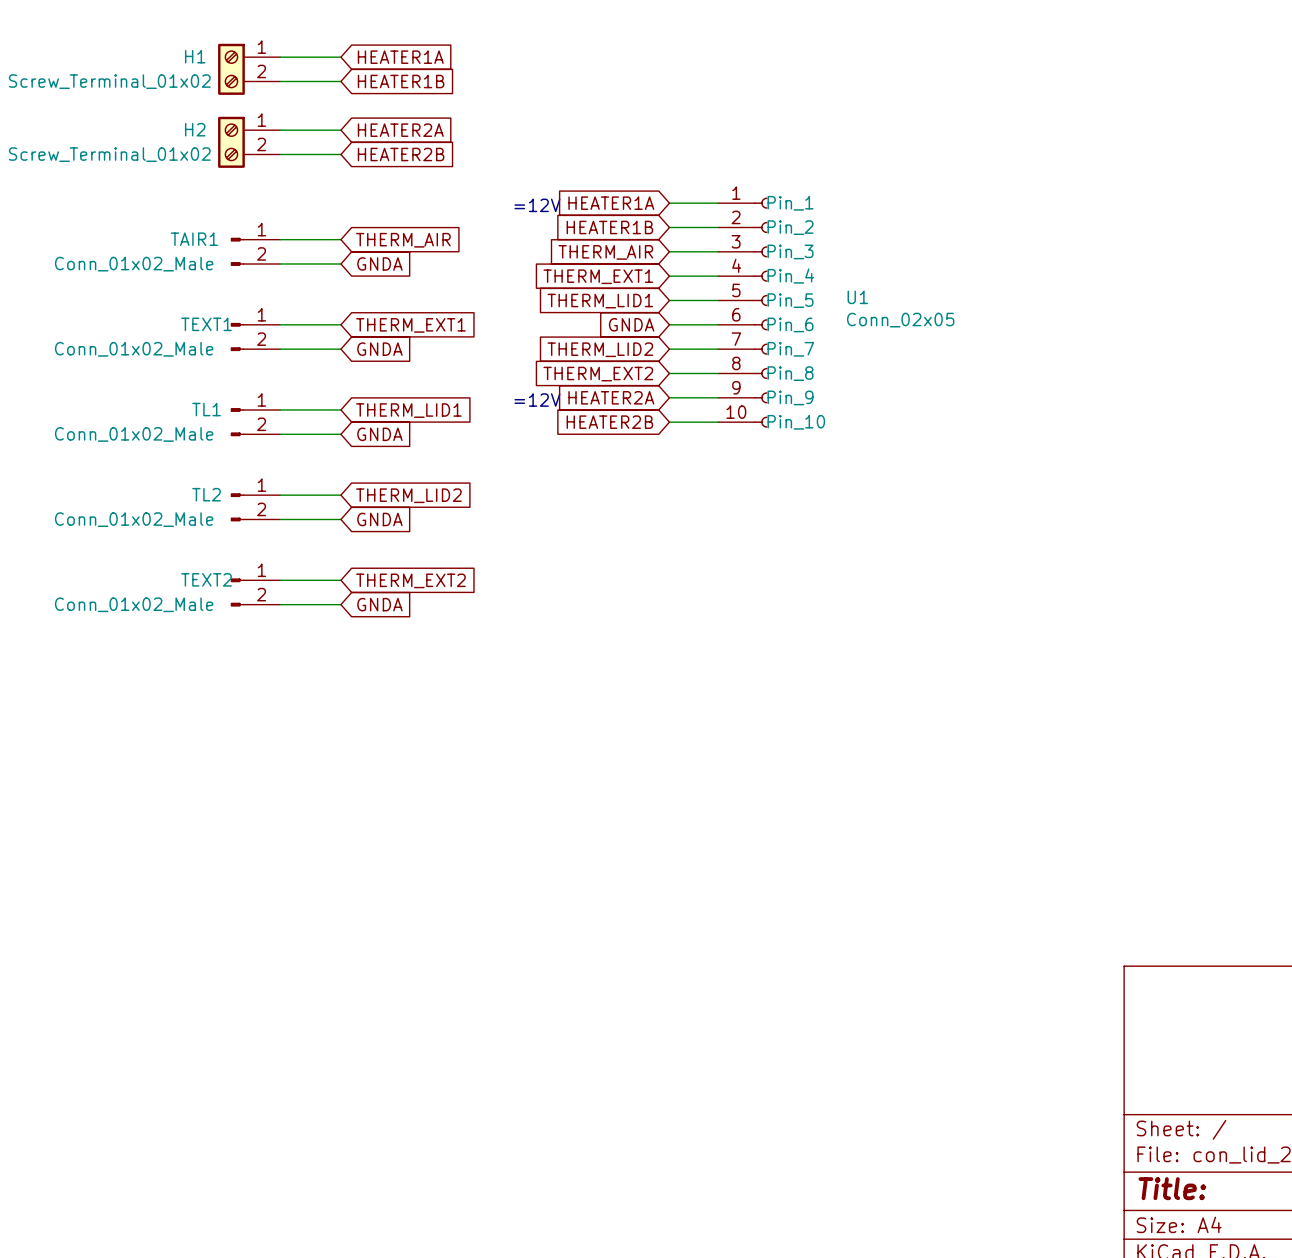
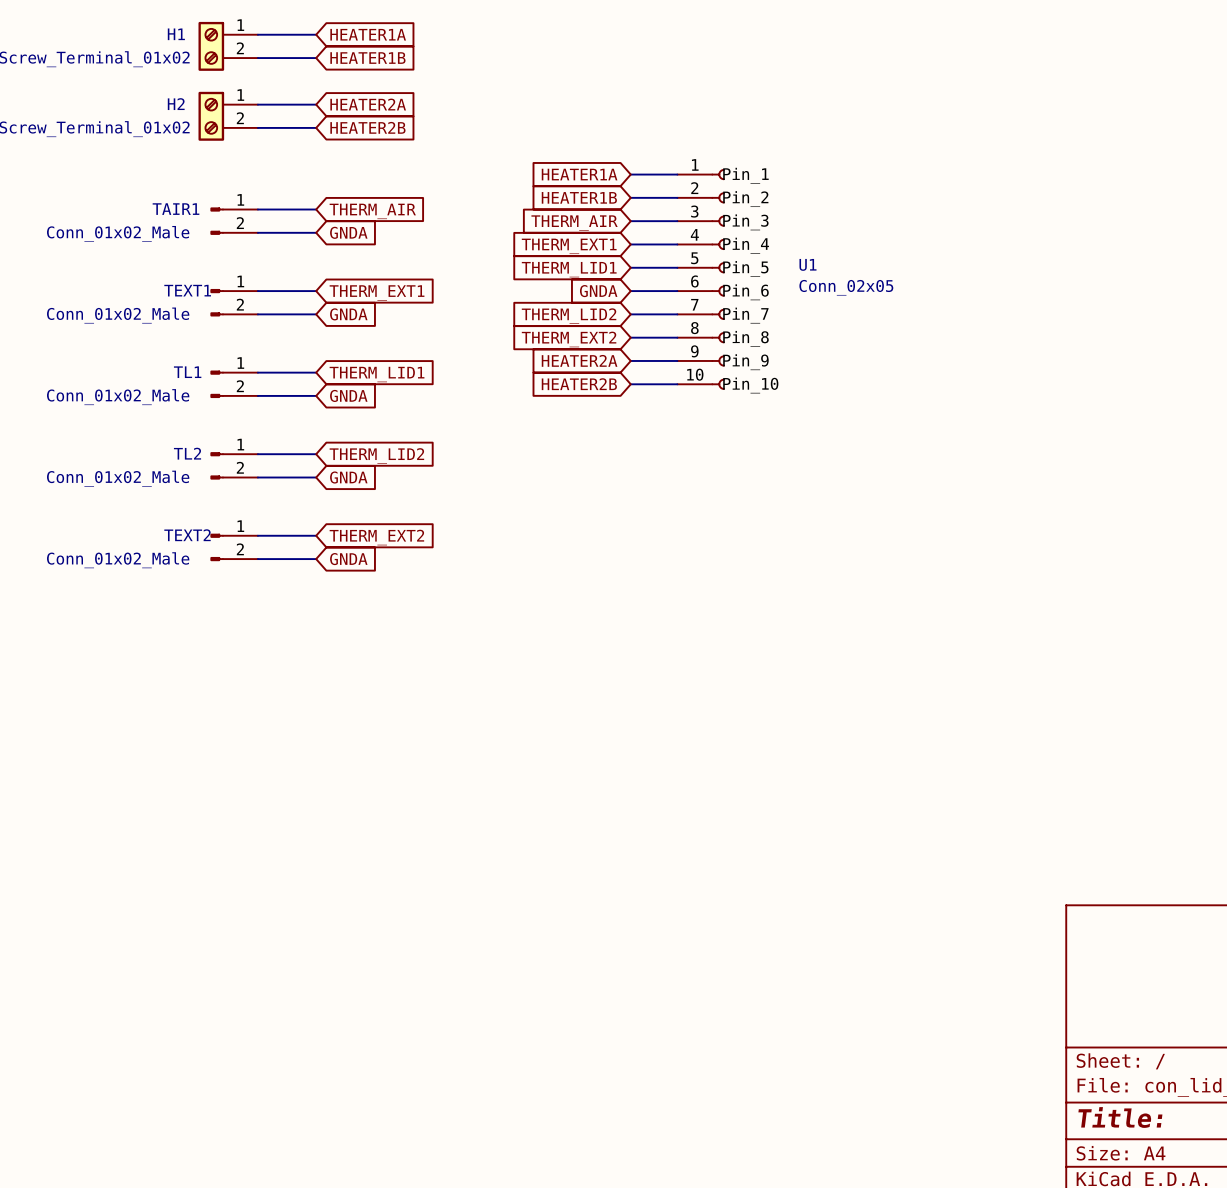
text: =12V (537, 205) -> none
text: =12V (537, 400) -> none

